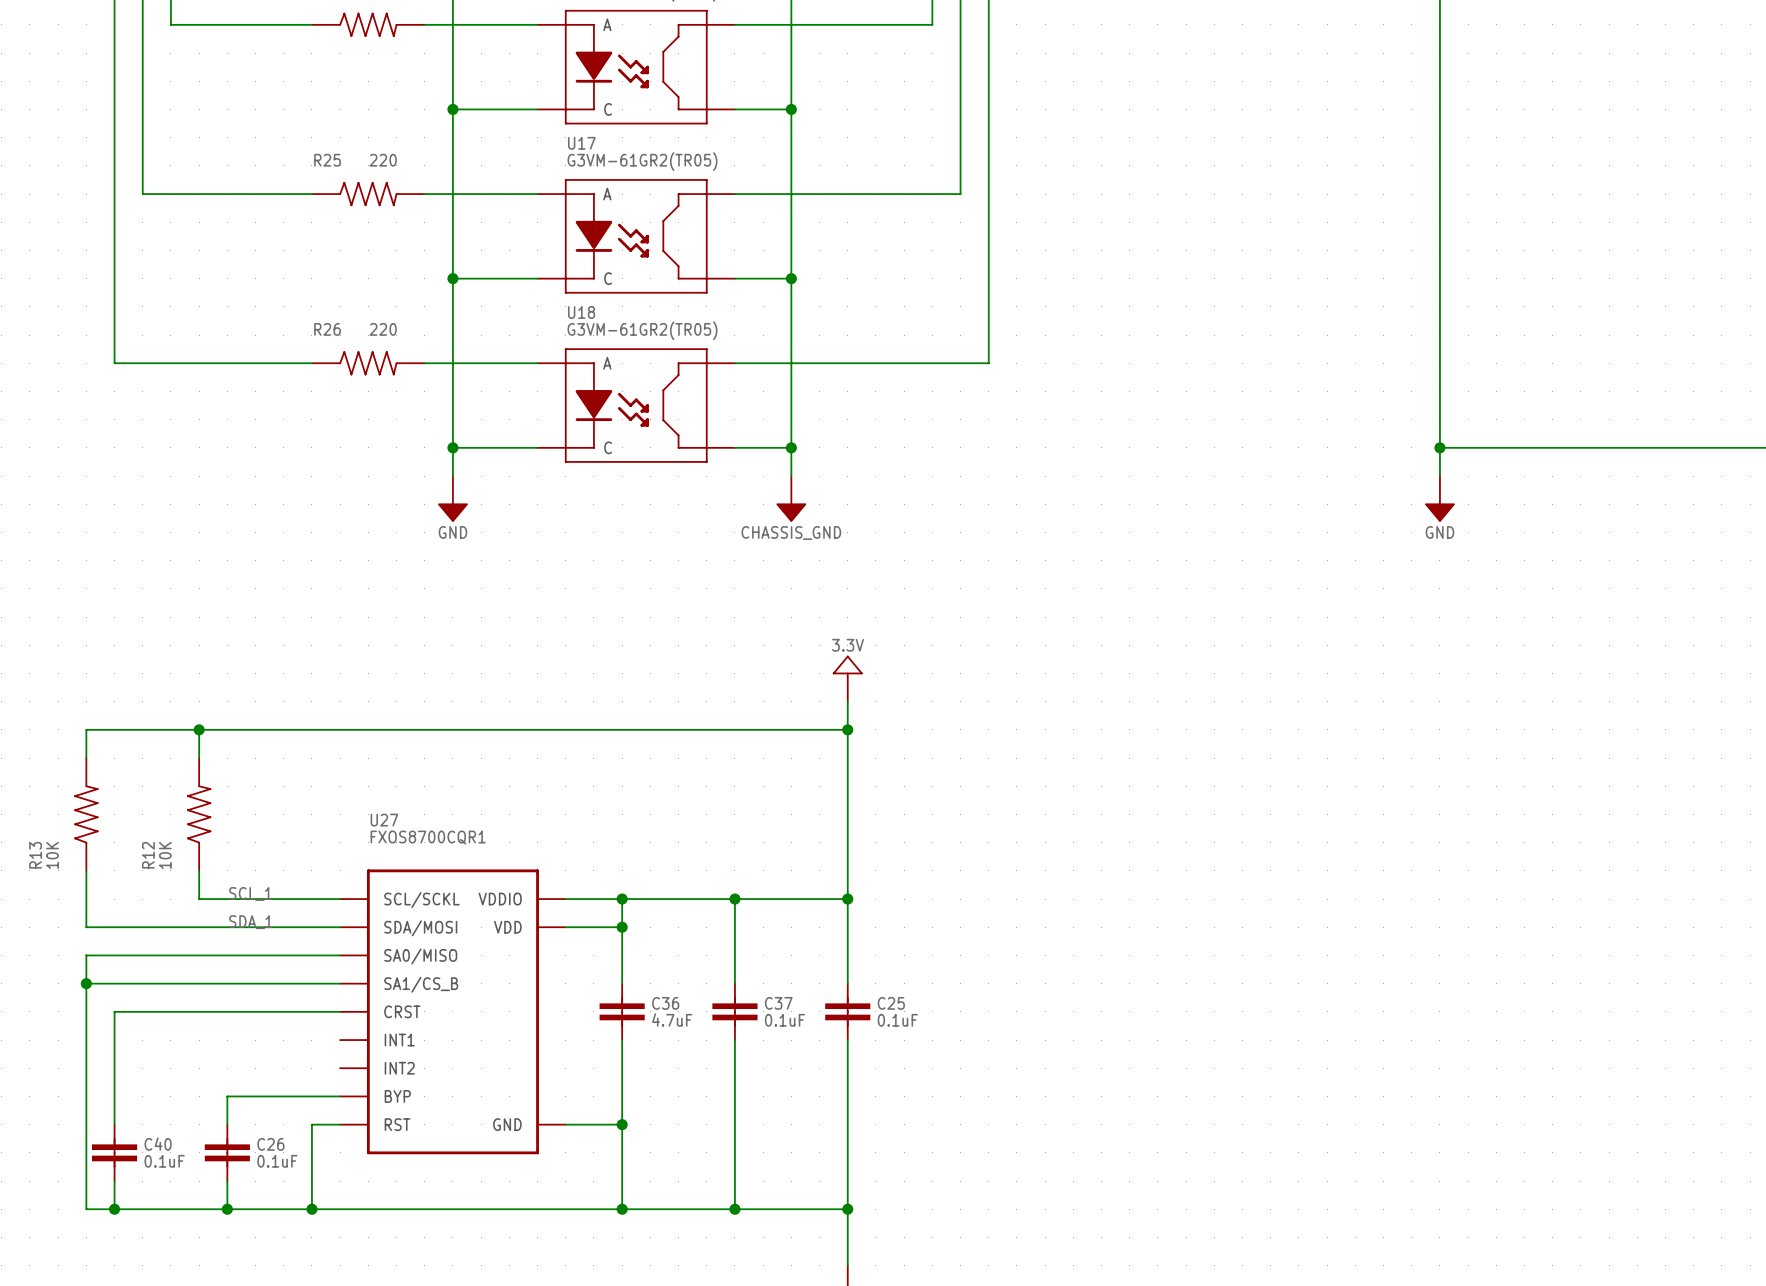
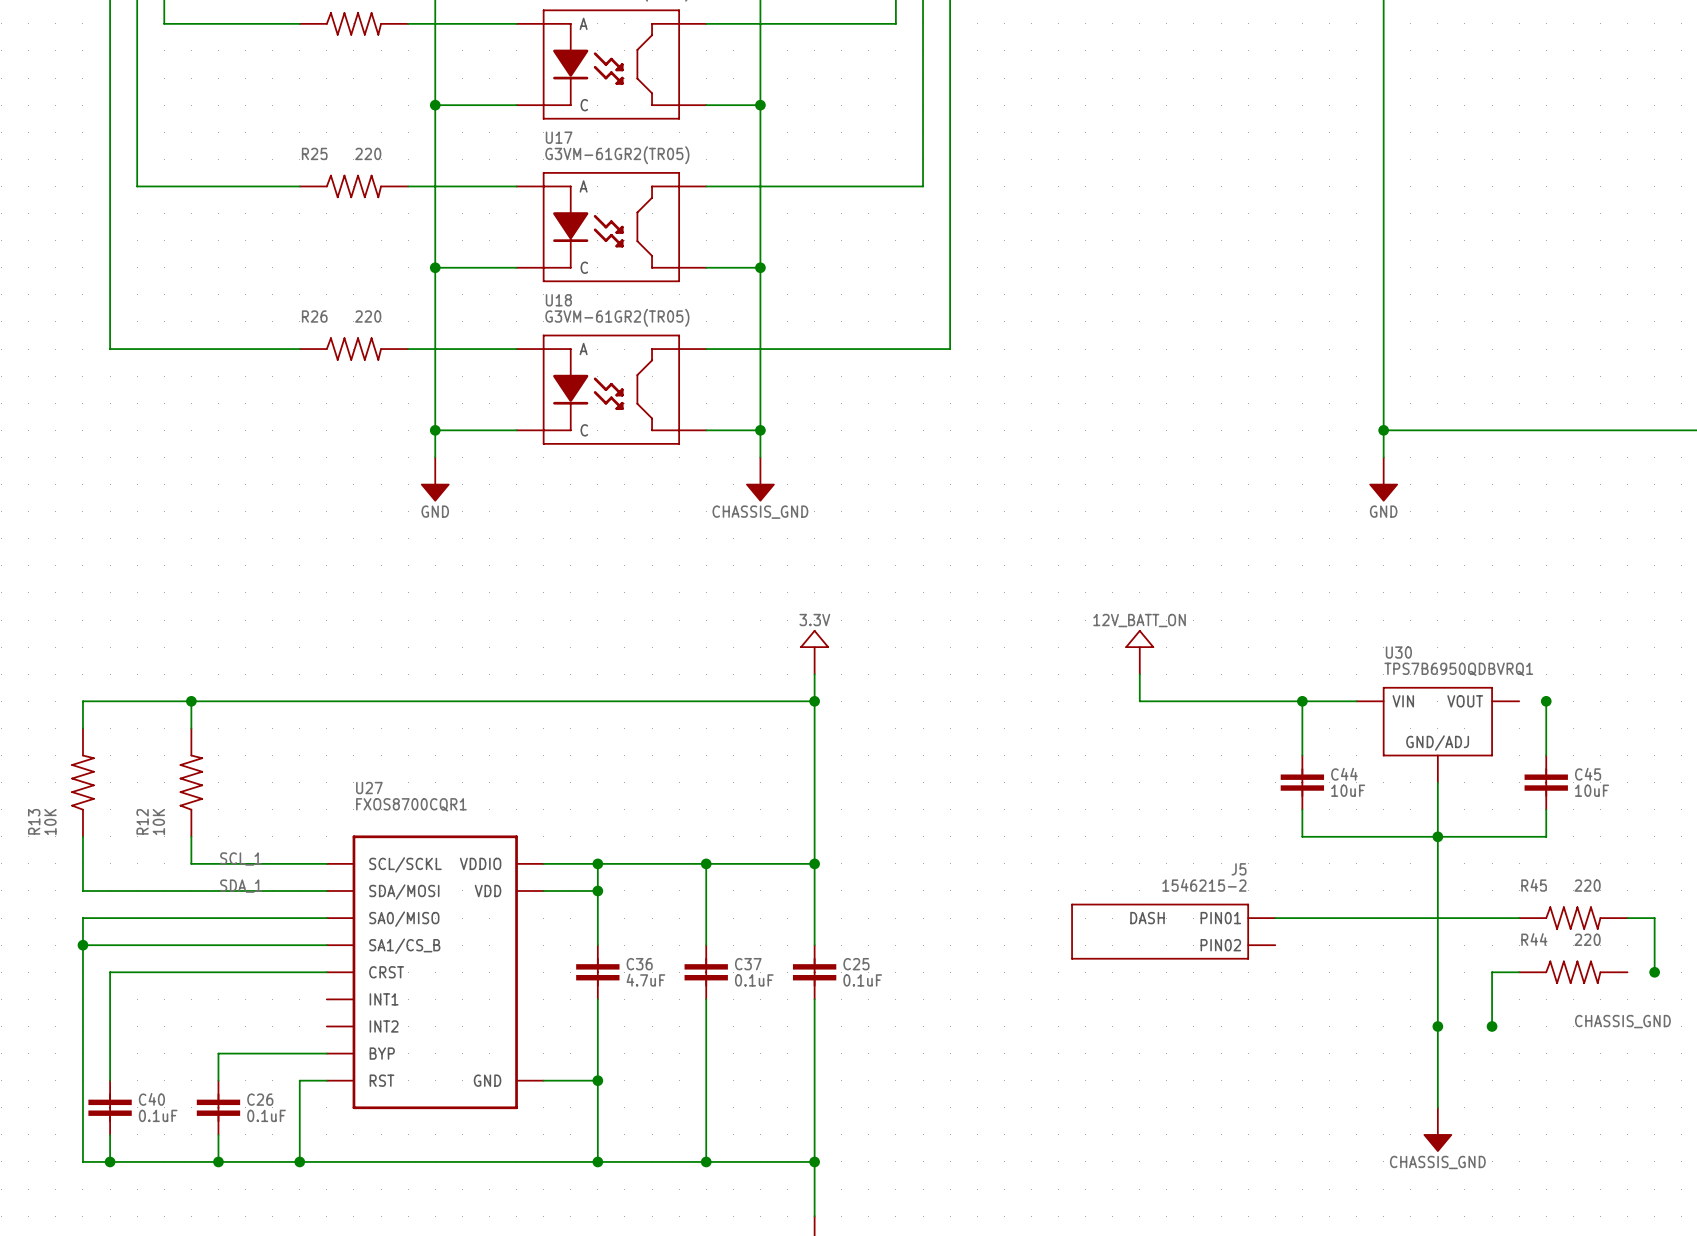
power symbol: none -> 12V_BATT_ON (1139, 652)
wire: none -> (1139, 674) (1139, 701) (1356, 701)
wire: none -> (1302, 701) (1302, 755)
junction: none -> (1302, 701)
wire: none -> (1546, 701) (1546, 755)
junction: none -> (1546, 701)
U30: none -> TPS7B6950QDBVRQ1 (1437, 734)
C44: none -> 10uF (1302, 782)
wire: none -> (1437, 782) (1437, 1107)
C45: none -> 10uF (1546, 782)
wire: none -> (1302, 809) (1302, 836) (1546, 836) (1546, 809)
junction: none -> (1437, 836)
wire: none -> (1275, 918) (1519, 918)
R45: none -> 220 (1573, 918)
wire: none -> (1627, 918) (1654, 918) (1654, 972)
J5: none -> 1546215-2 (1173, 931)
wire: none -> (1519, 972) (1492, 972) (1492, 1026)
R44: none -> 220 (1573, 972)
junction: none -> (1654, 972)
label: none -> CHASSIS_GND (1622, 1021)
junction: none -> (1437, 1026)
junction: none -> (1492, 1026)
power symbol: none -> CHASSIS_GND (1437, 1129)

